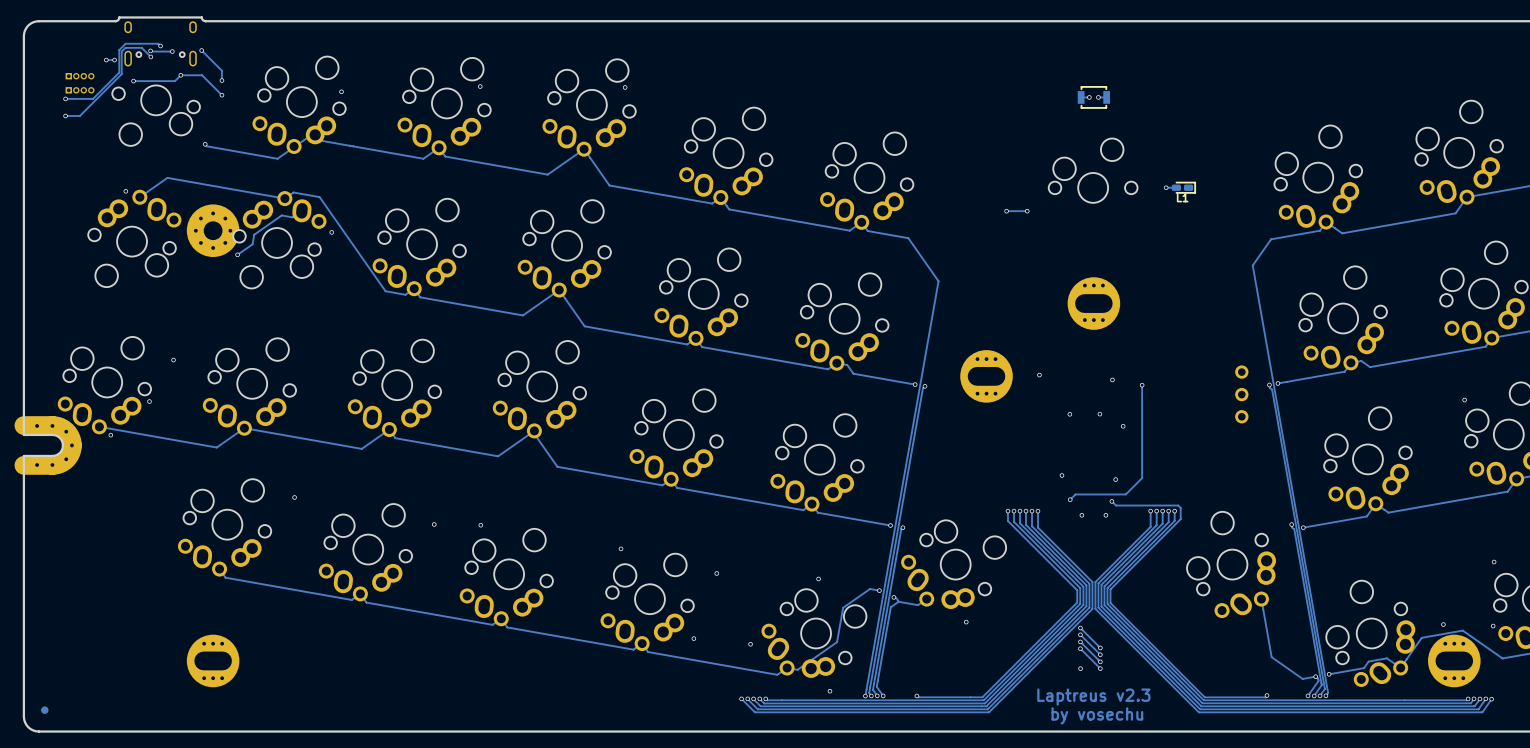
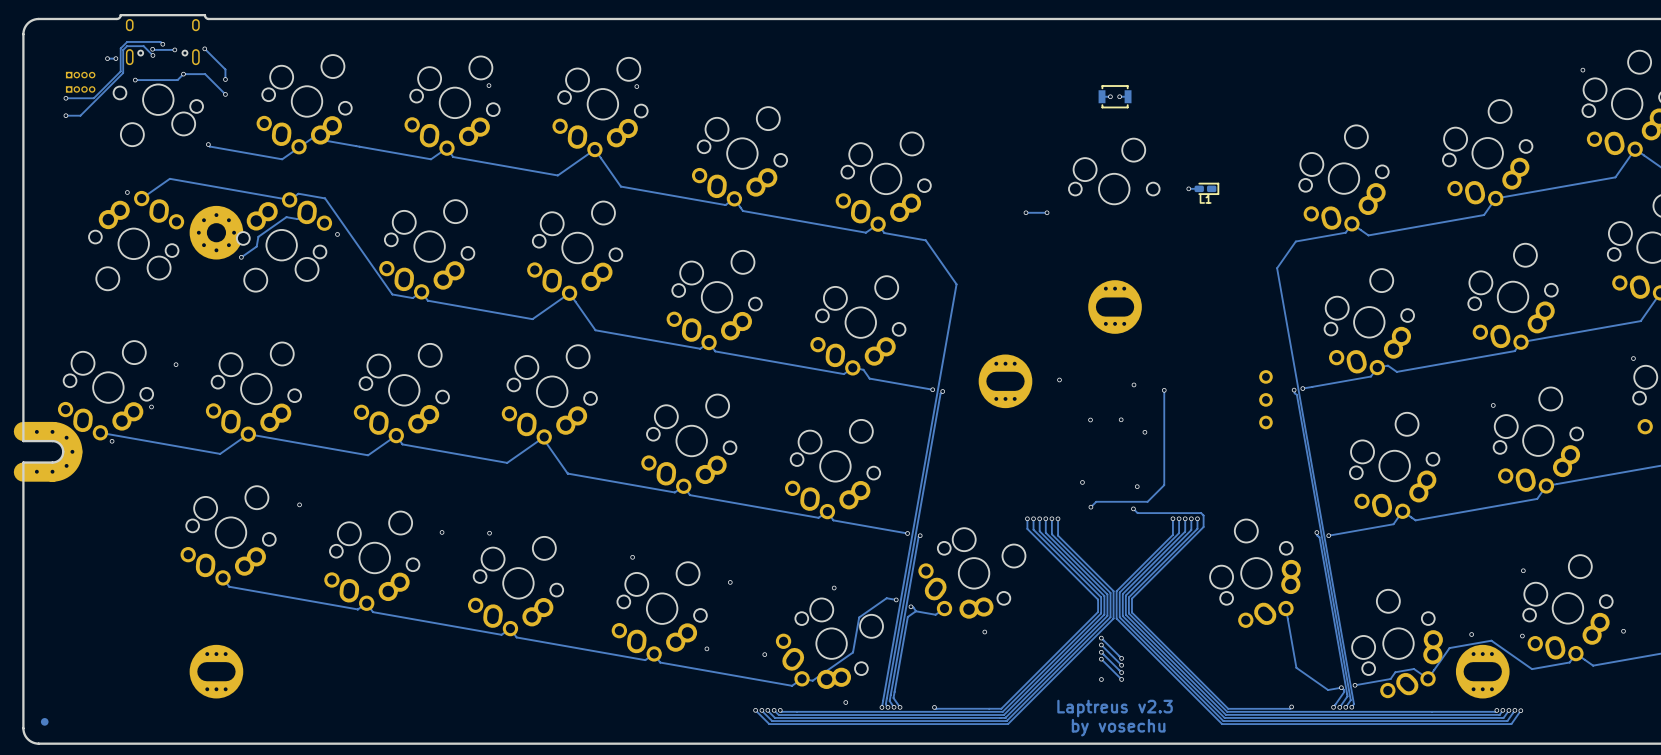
via: (341, 91) -> none
via: (1081, 515) -> none
via: (1105, 515) -> none

